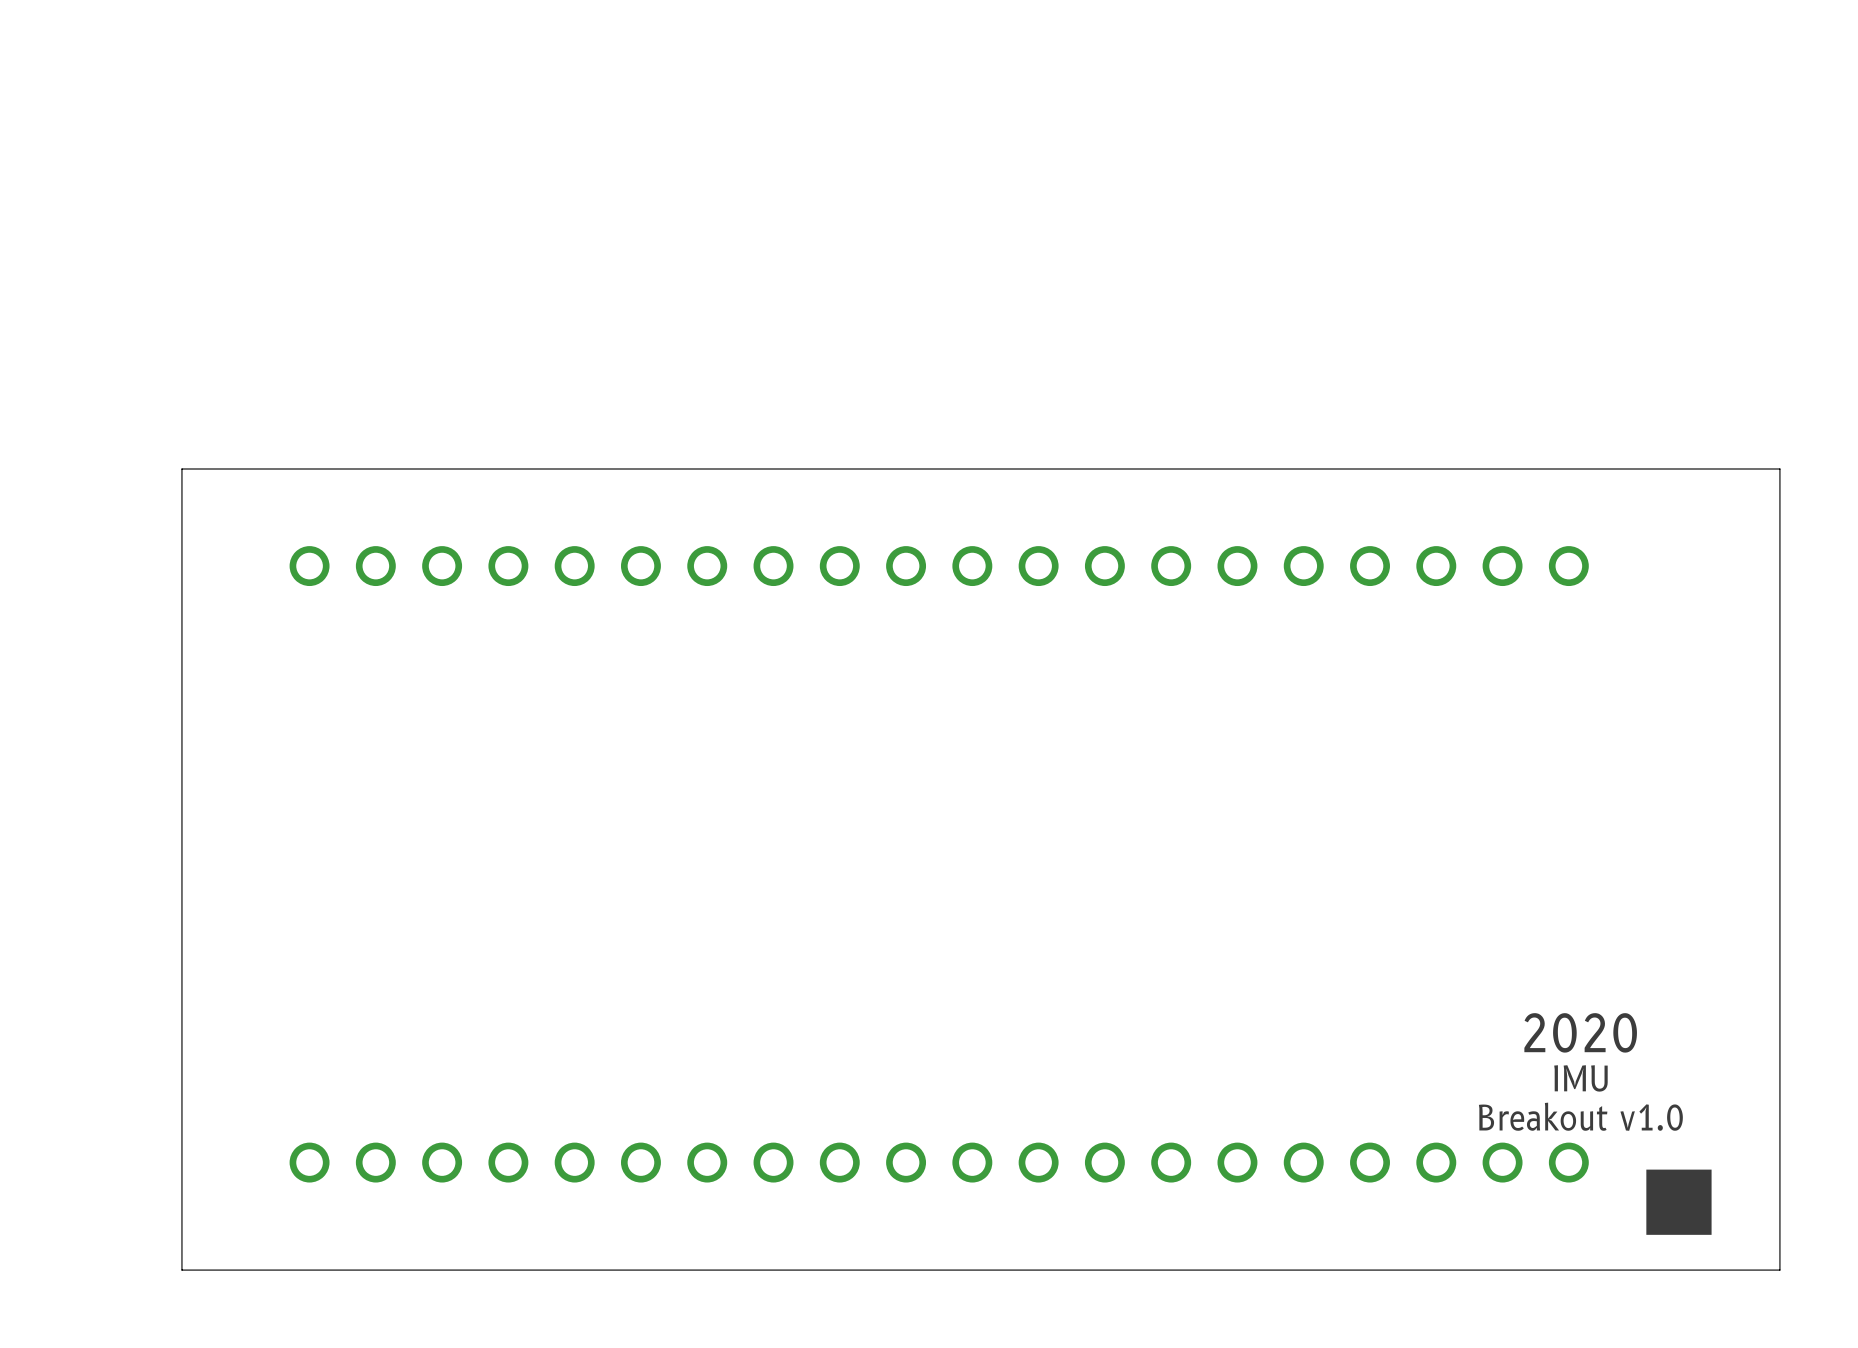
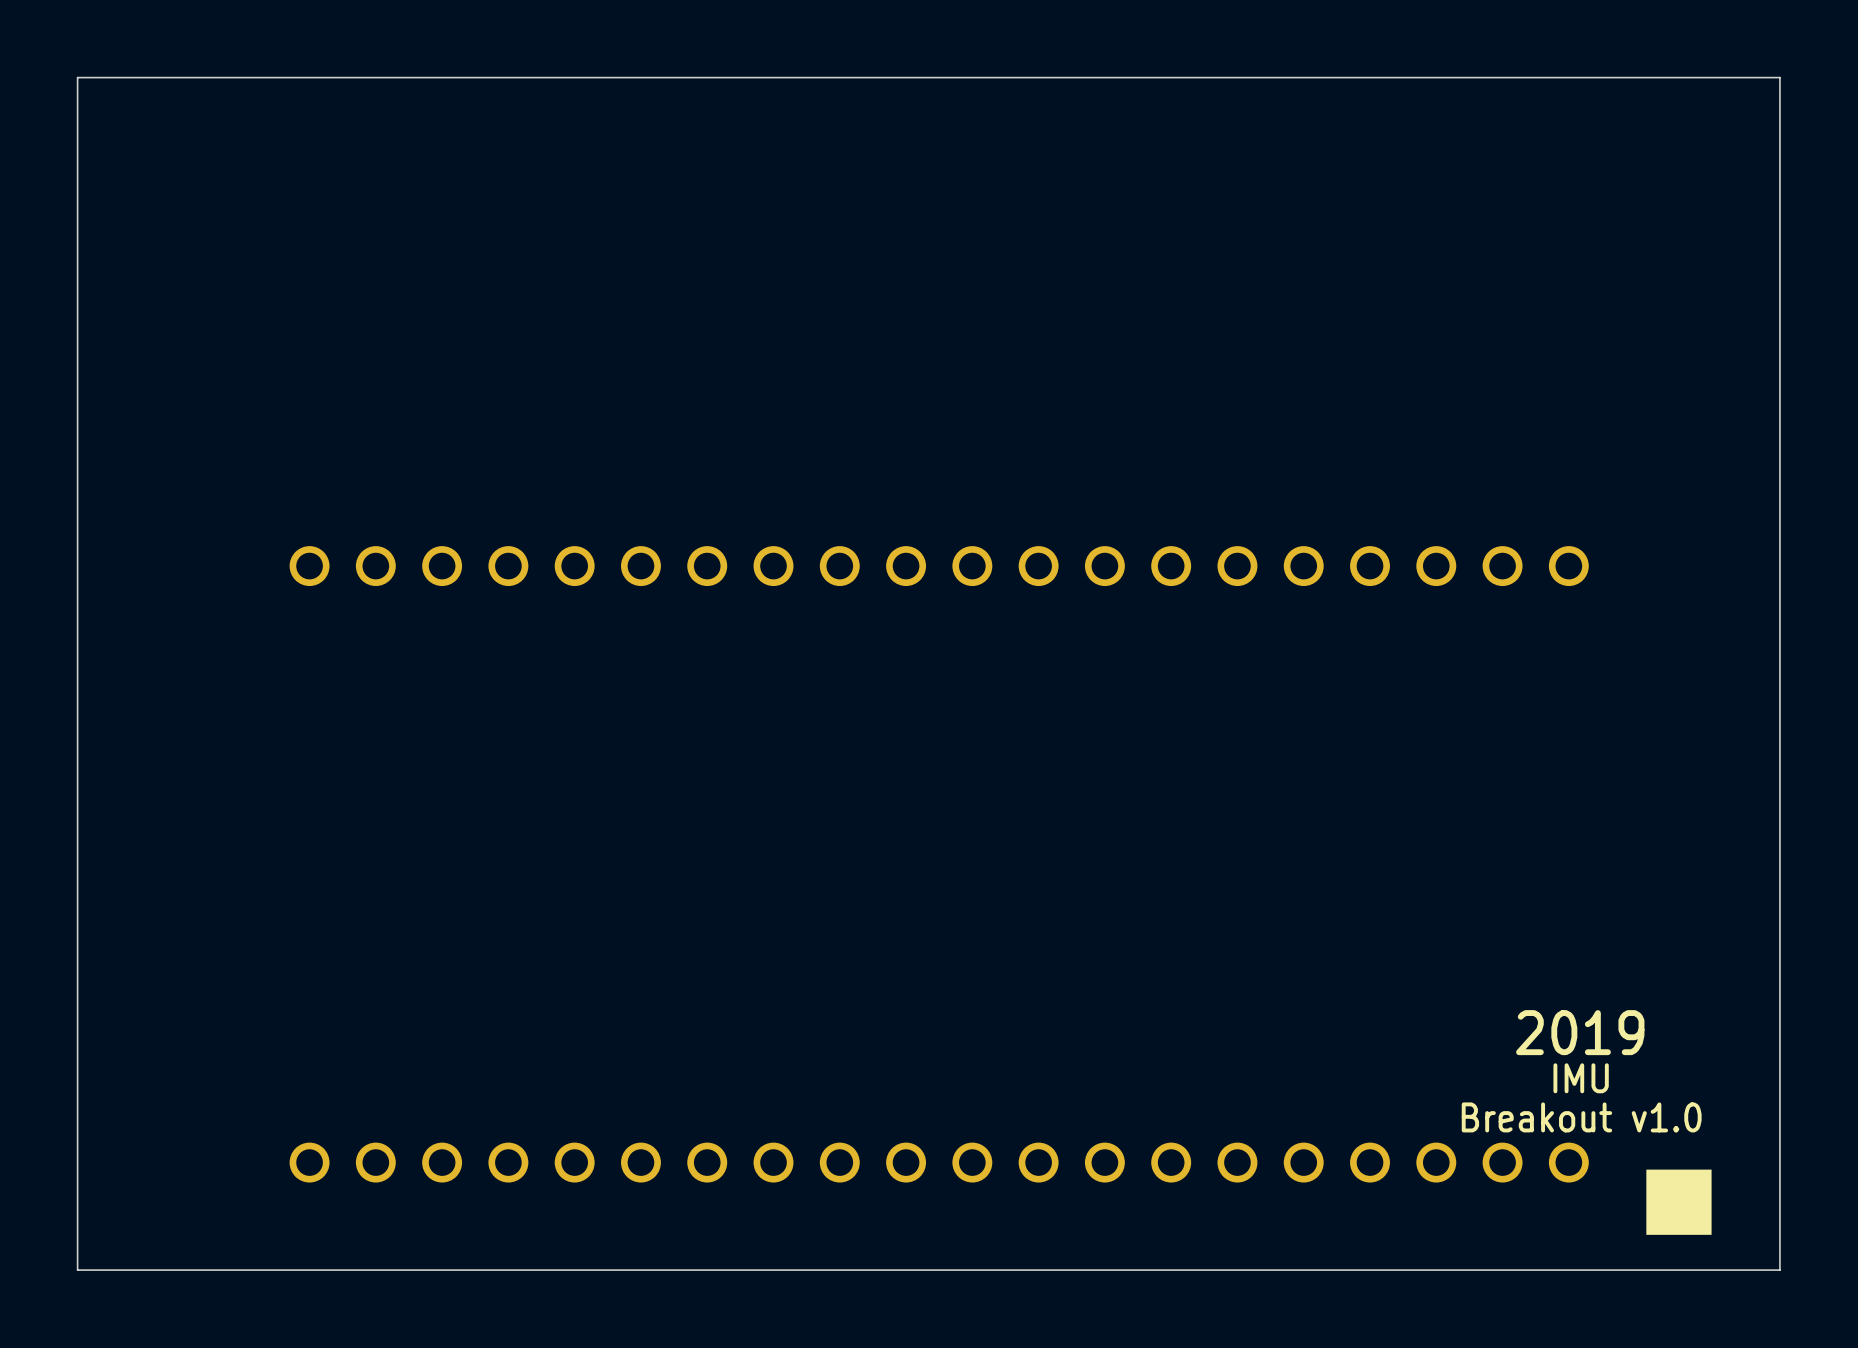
board edge: (1779, 469) (181, 469) (181, 1270) -> (1779, 469) (1779, 77) (77, 77) (77, 1270) (181, 1270)
text: 2020 (1580, 1032) -> 2019 (1580, 1032)

